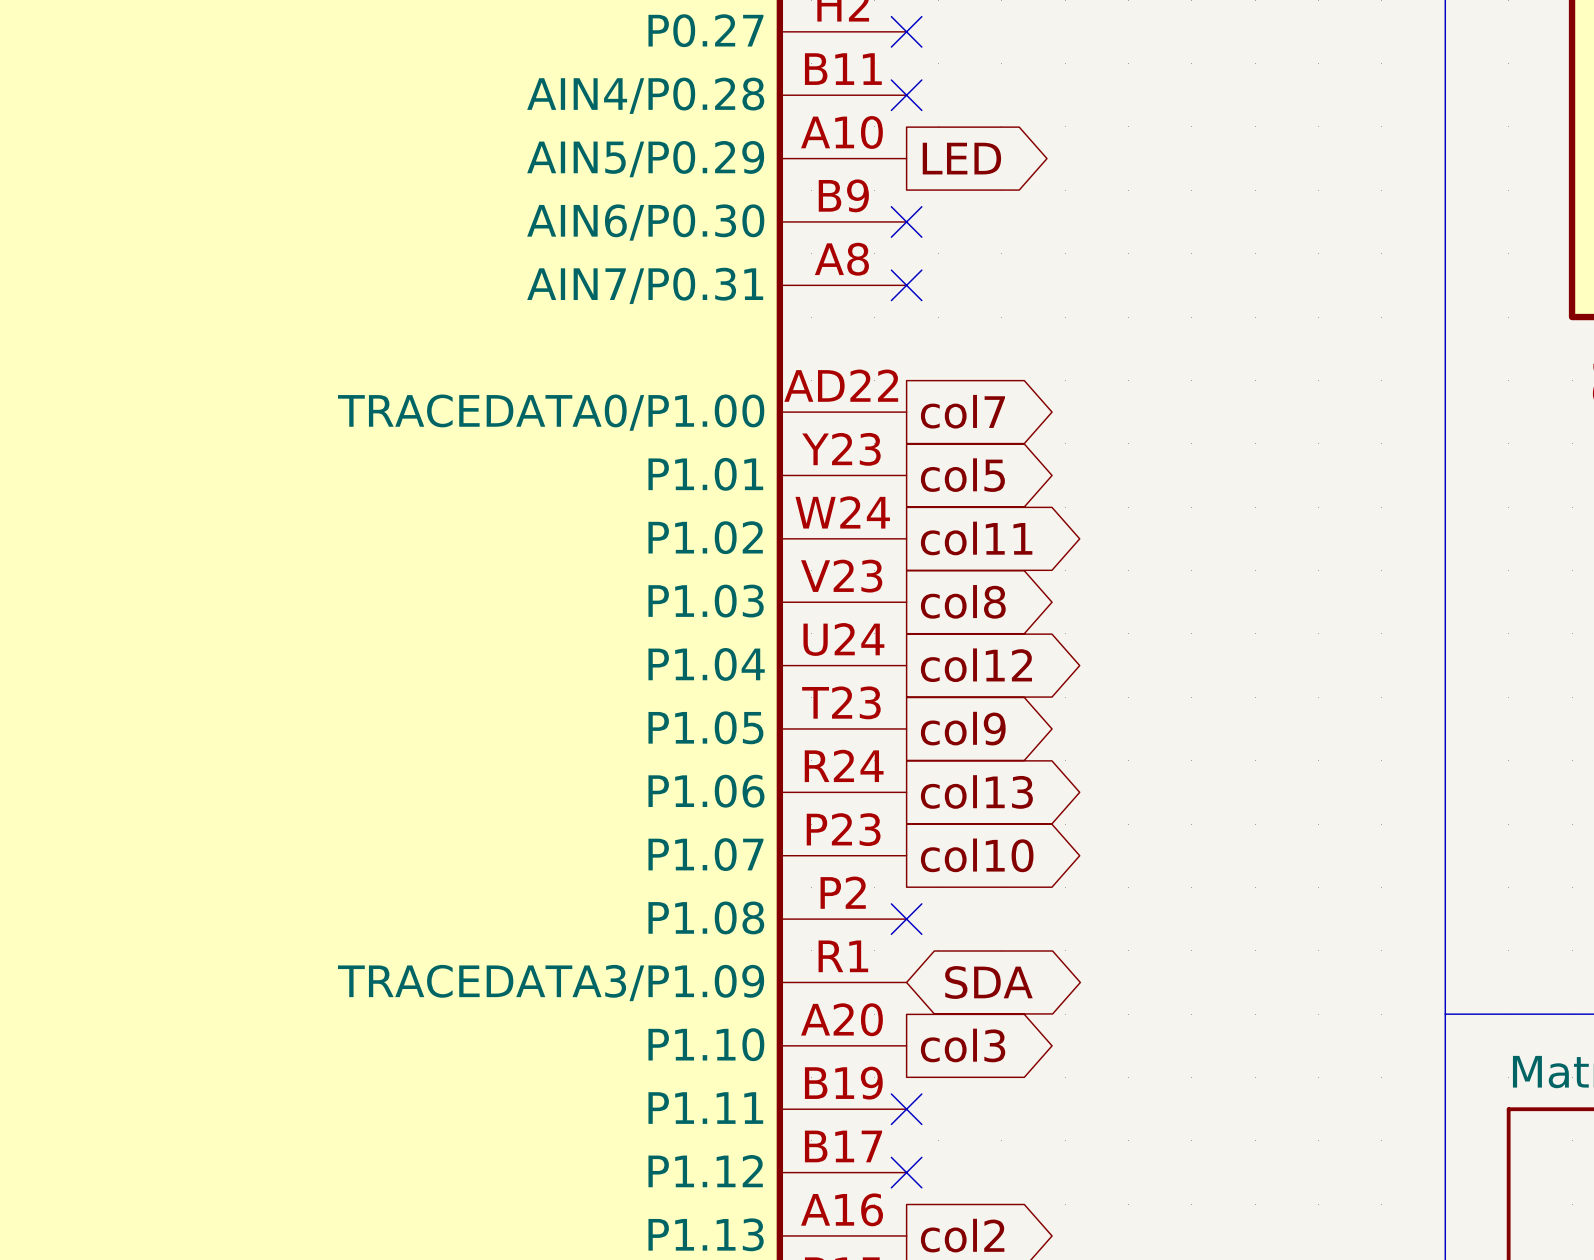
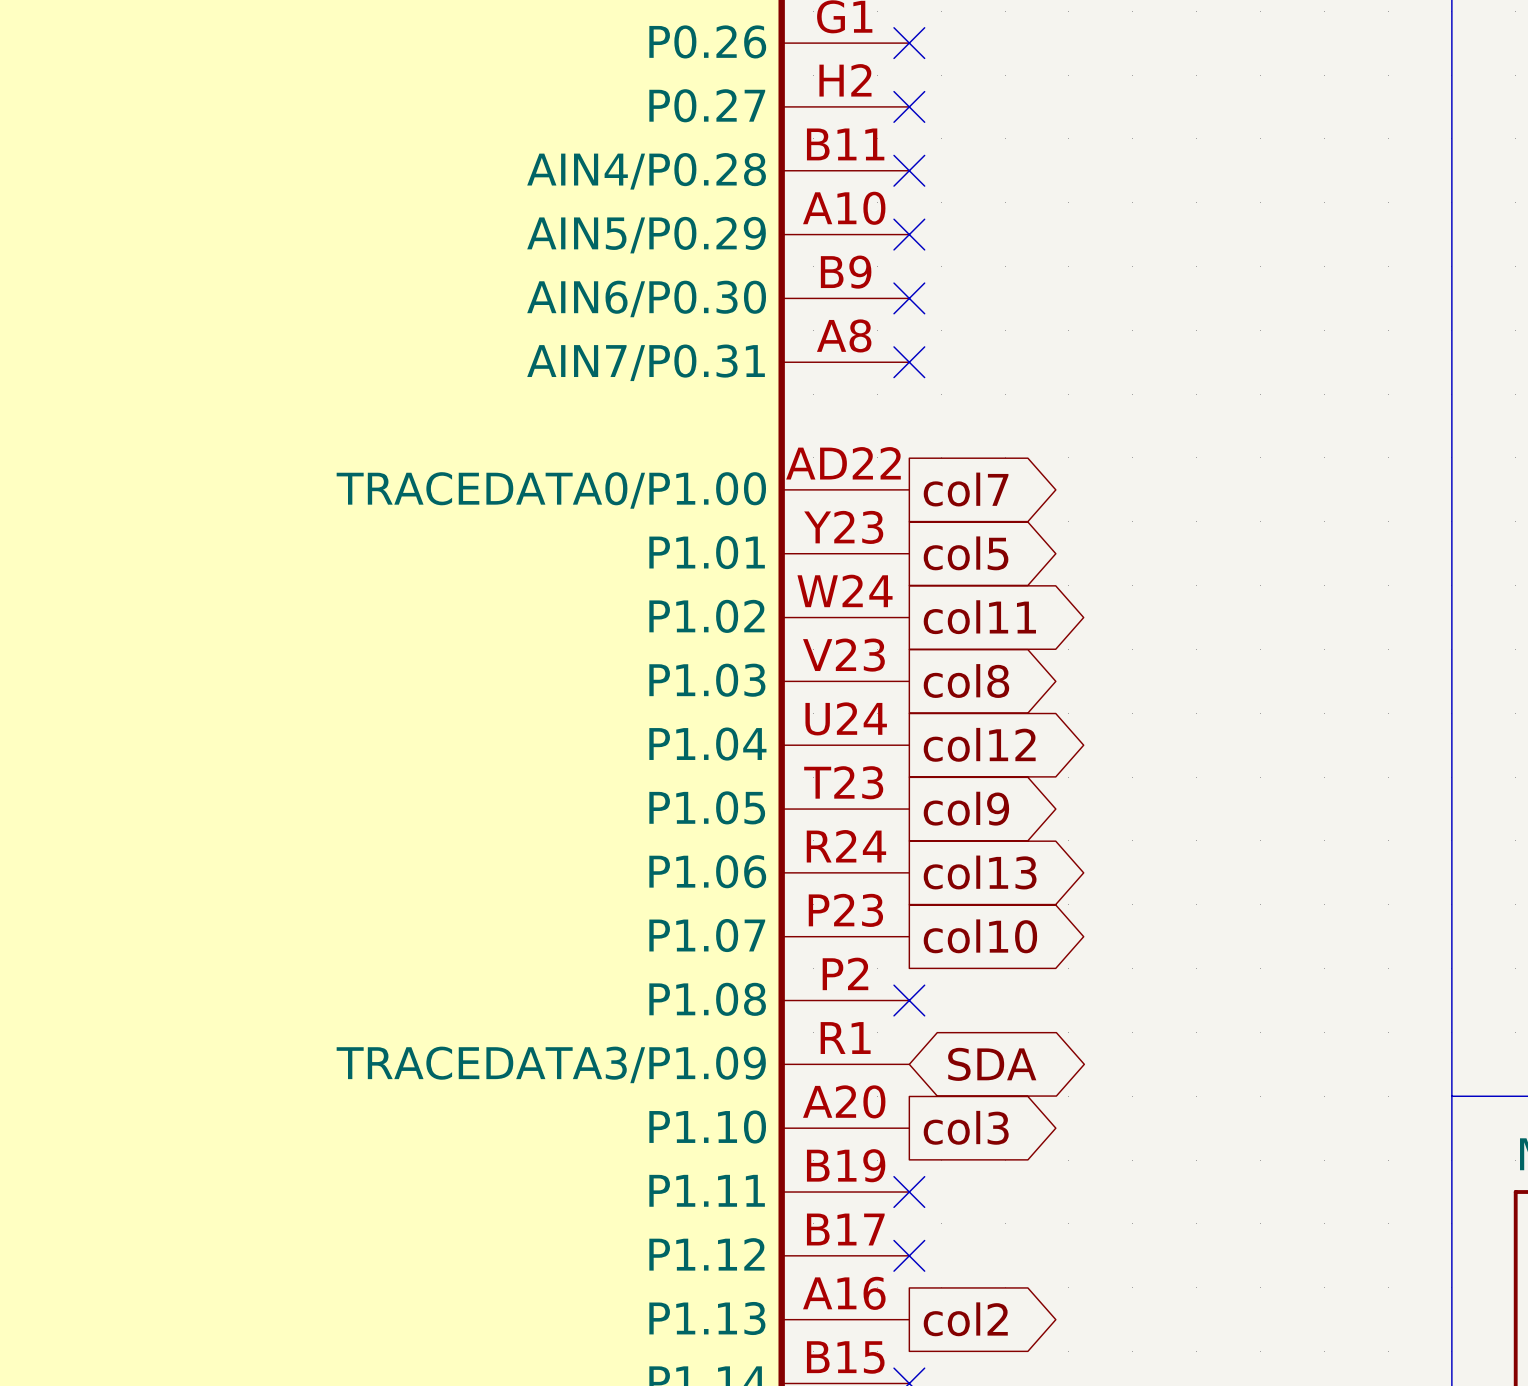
no-connect mark: none -> (909, 234)
global label: LED (961, 158) -> none

